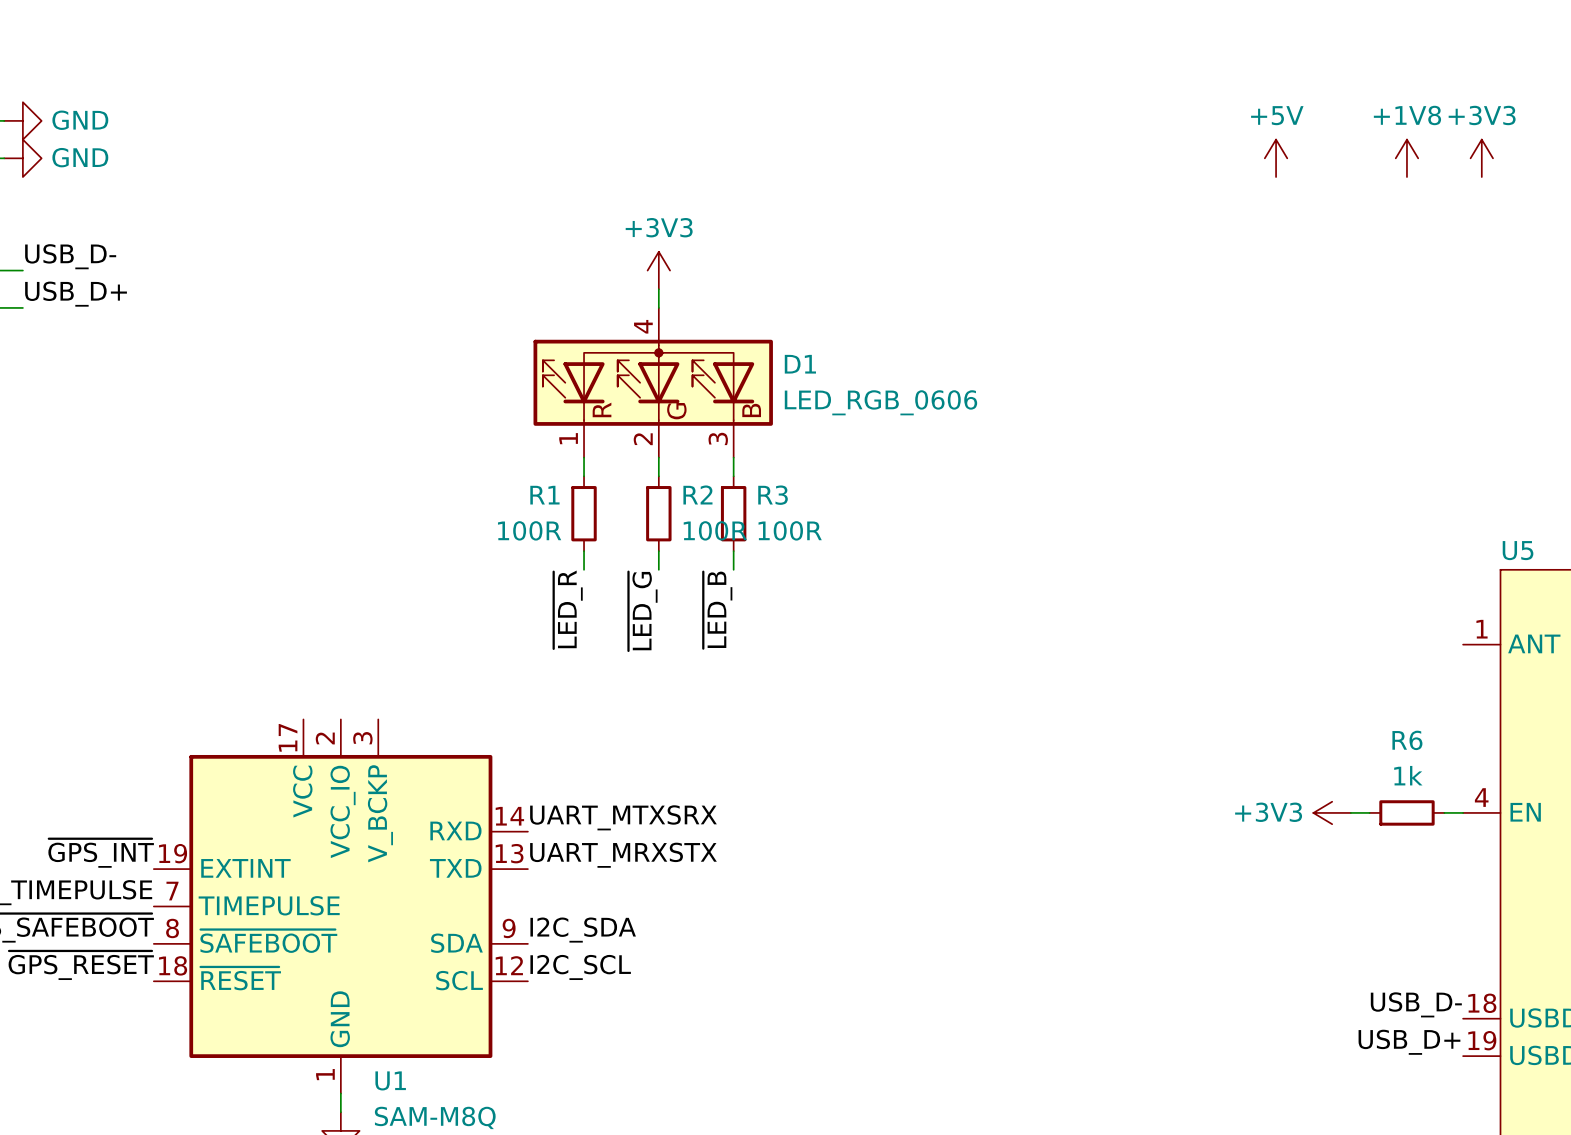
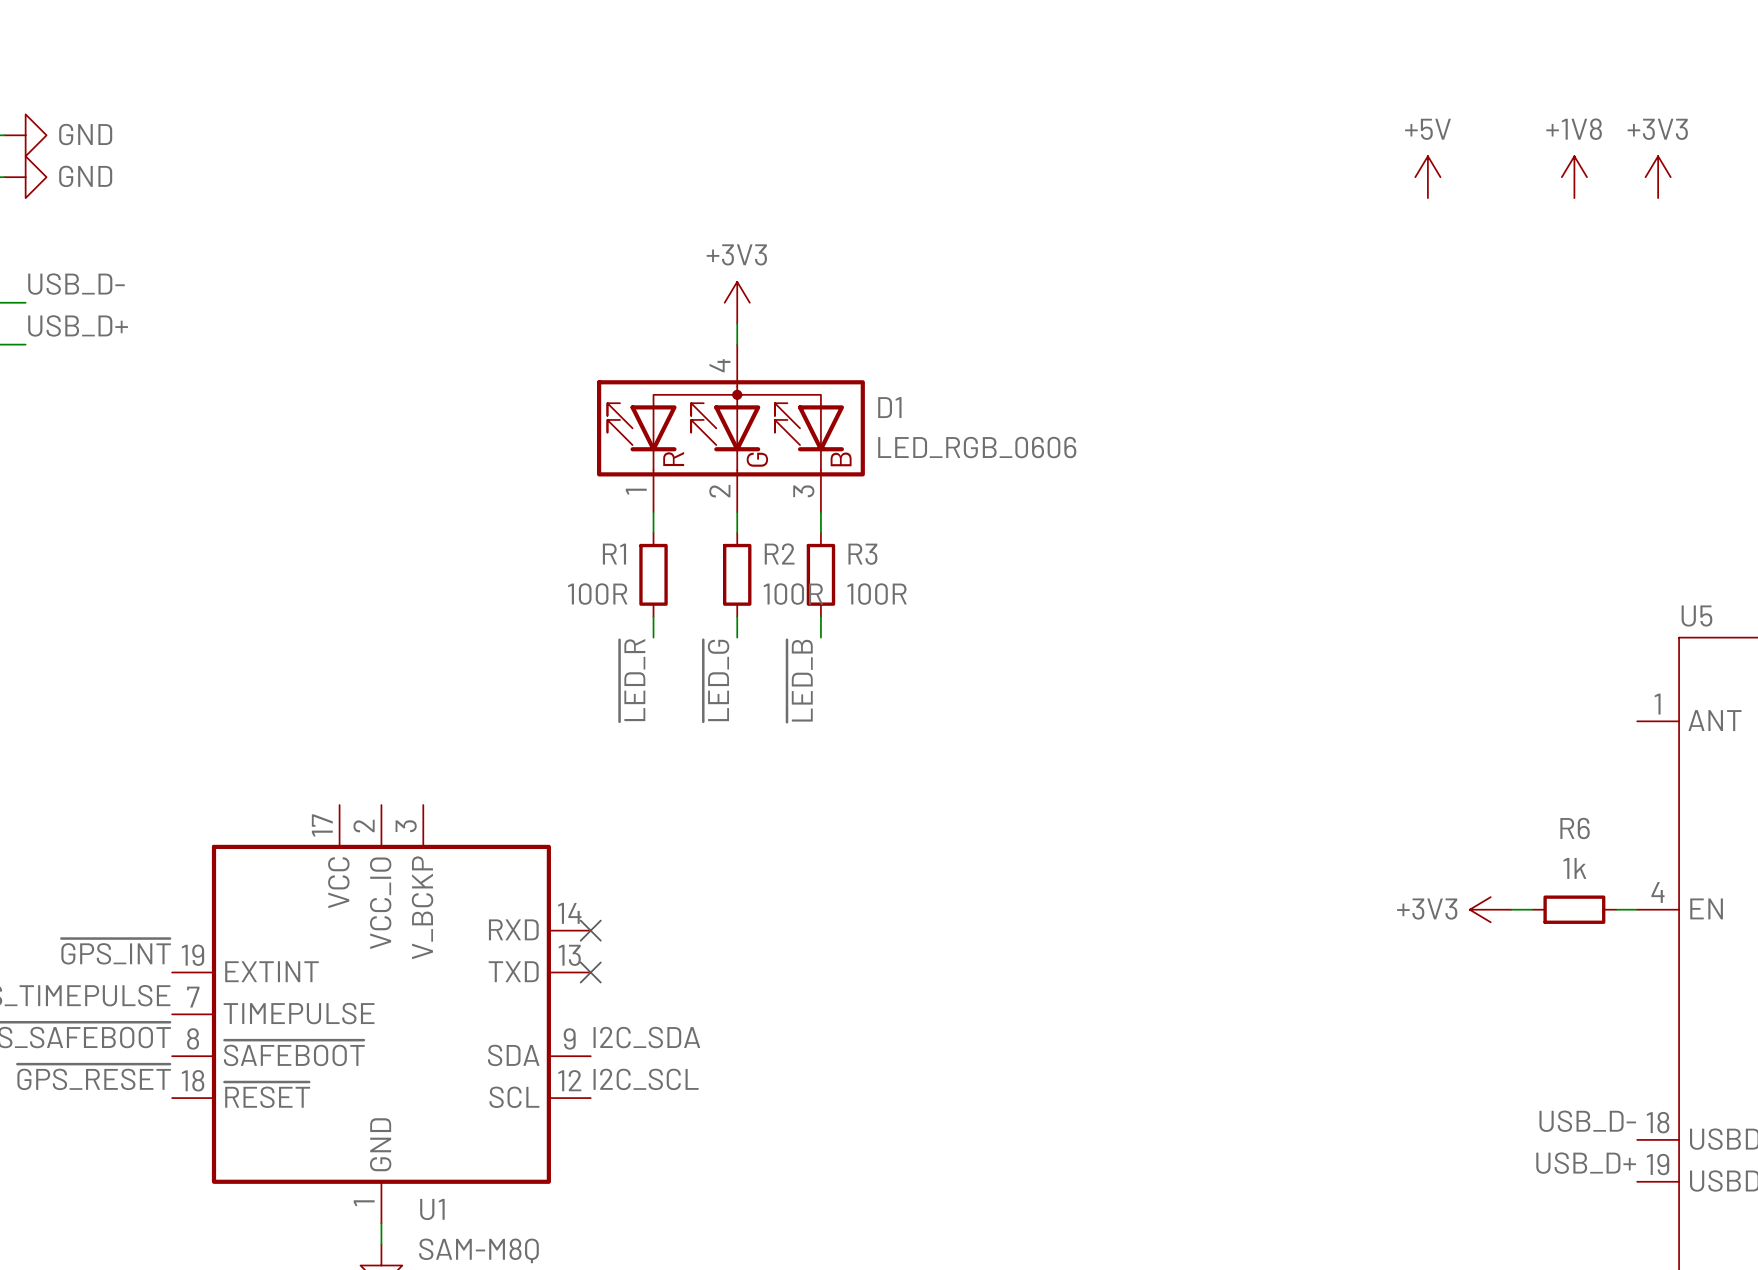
label: UART_MTXSRX (623, 817) -> none
no-connect mark: none -> (590, 930)
label: UART_MRXSTX (623, 855) -> none
no-connect mark: none -> (590, 972)

